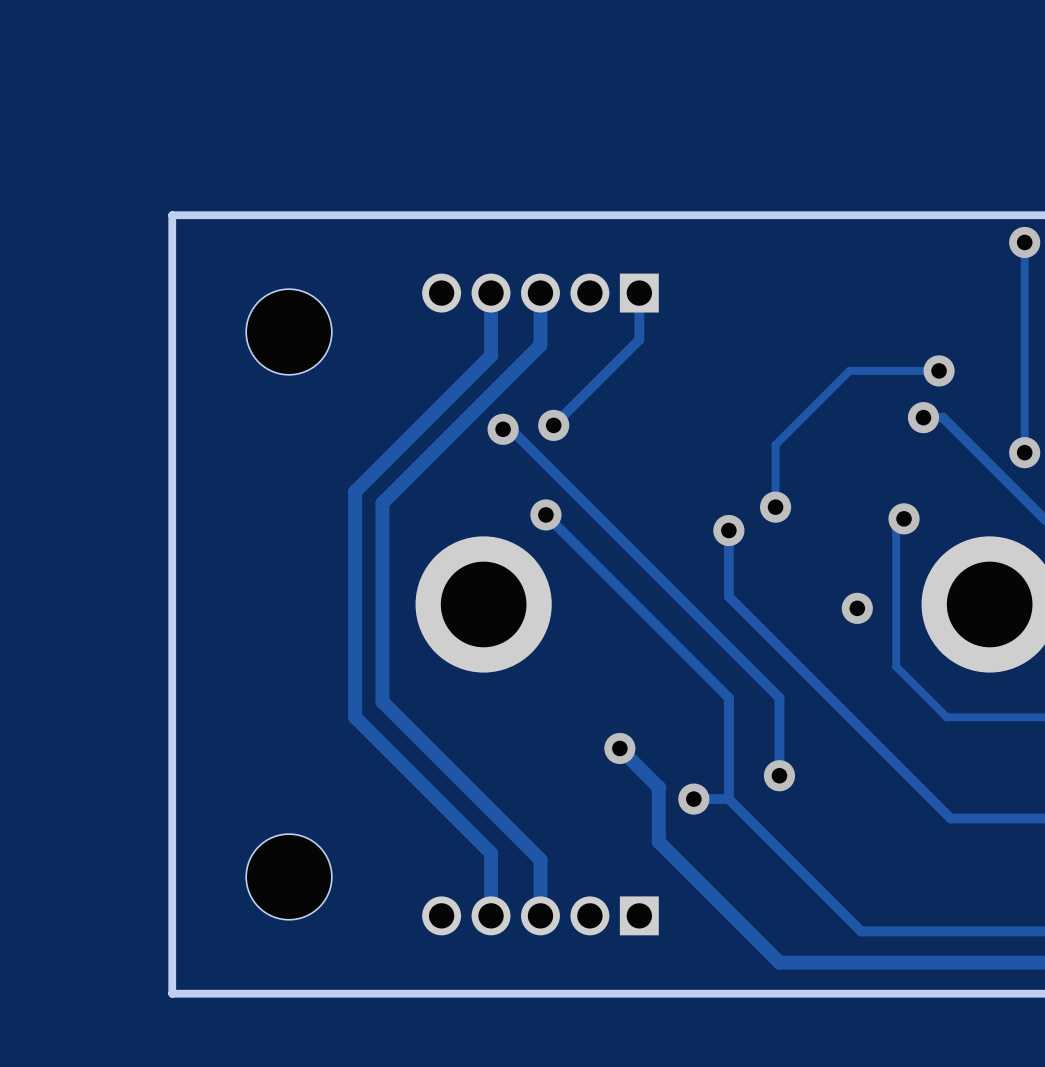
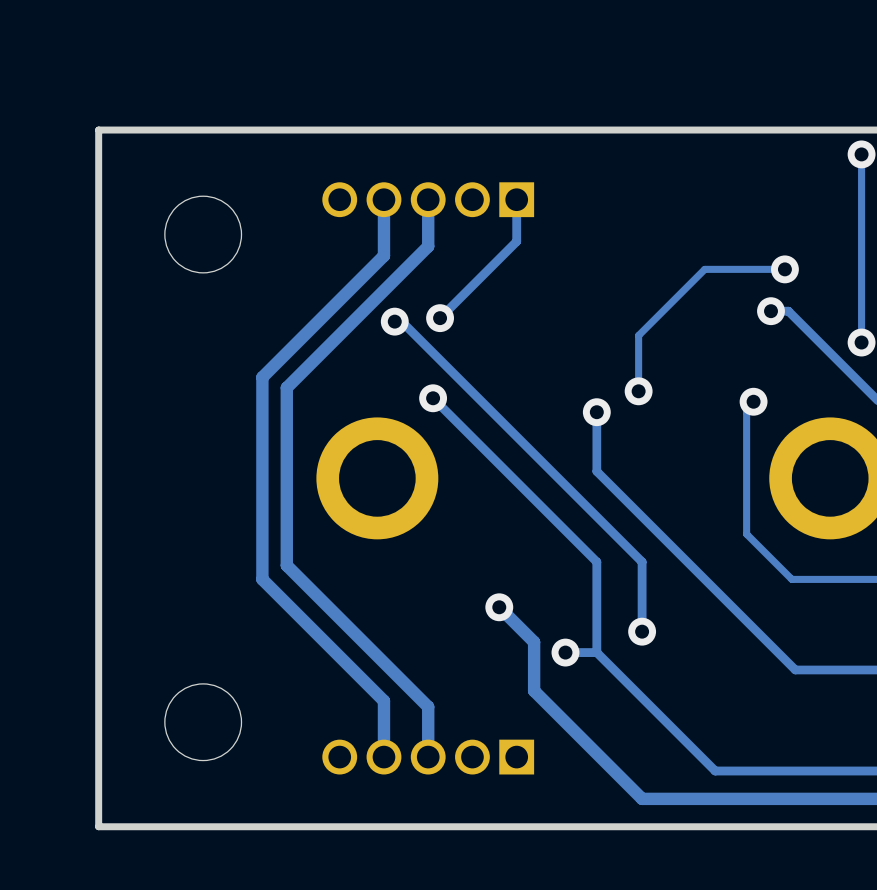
via: (857, 608) -> none

